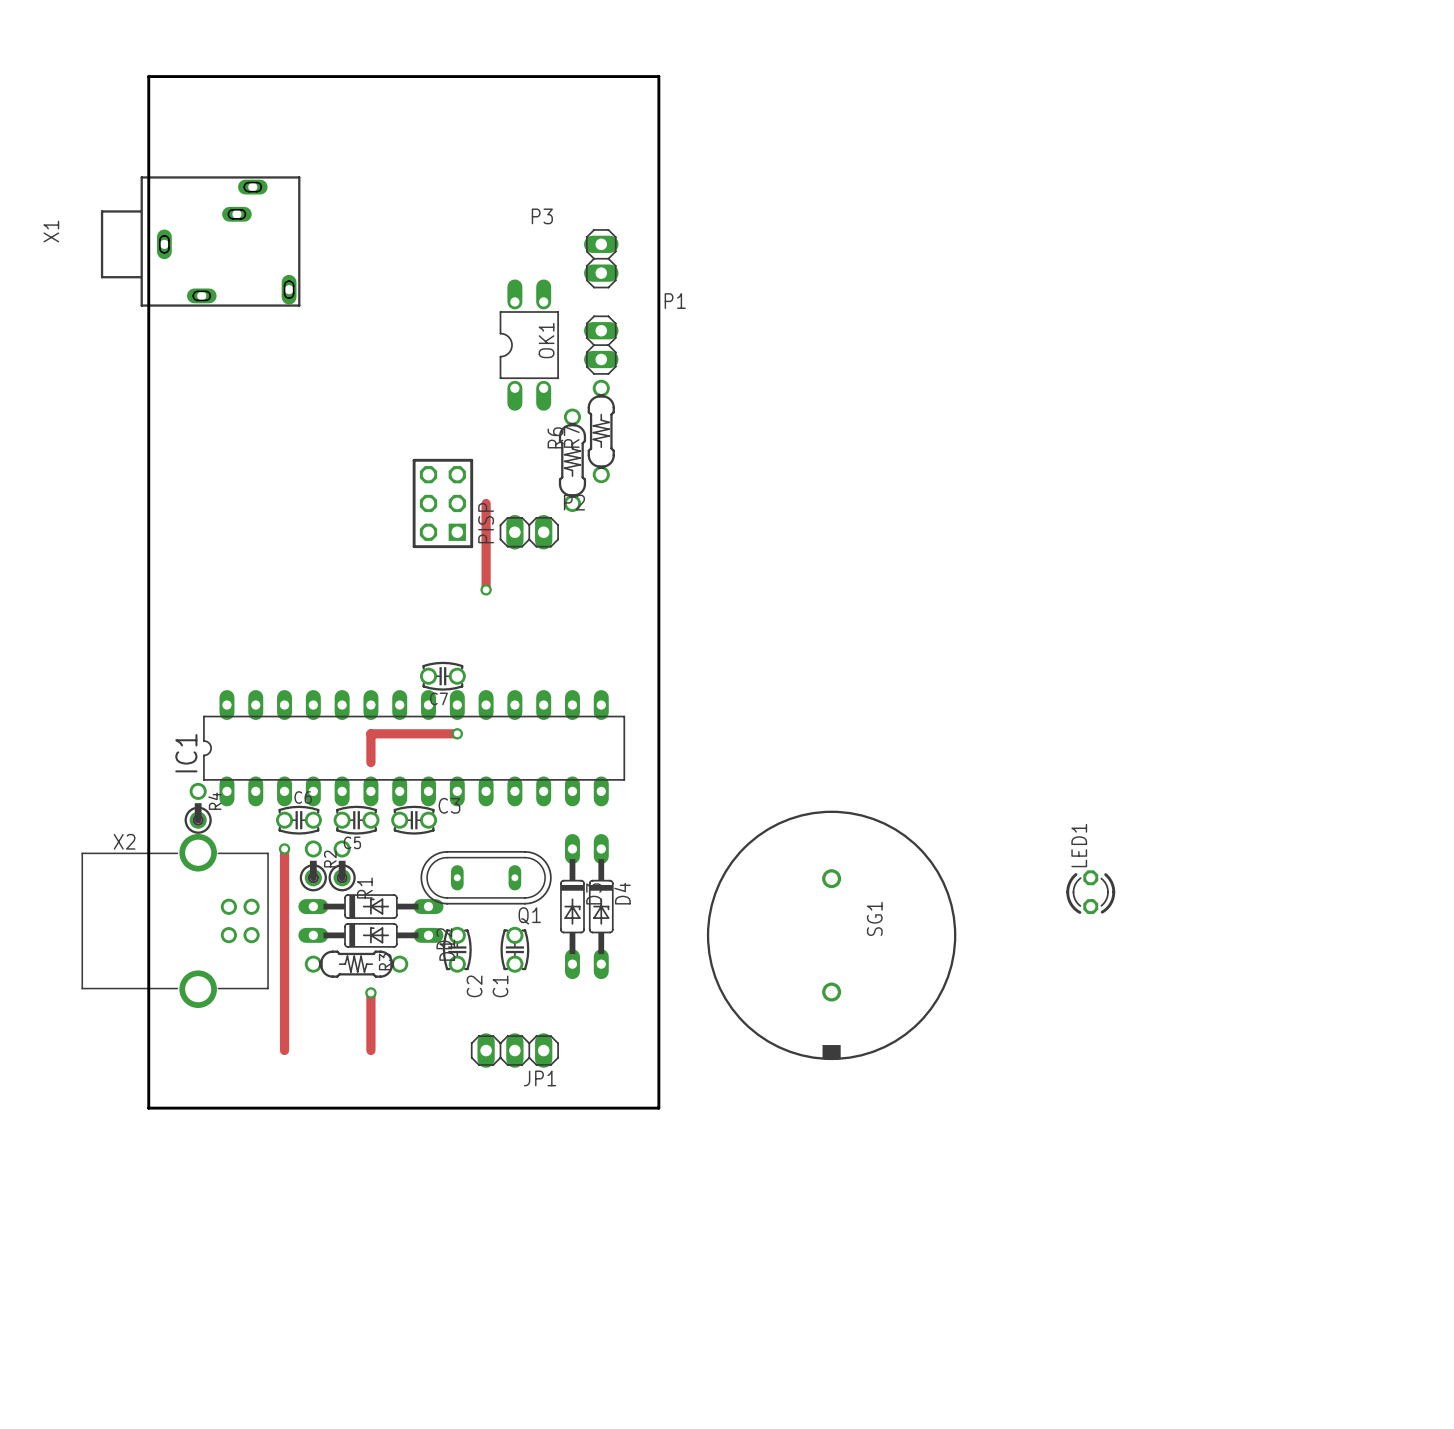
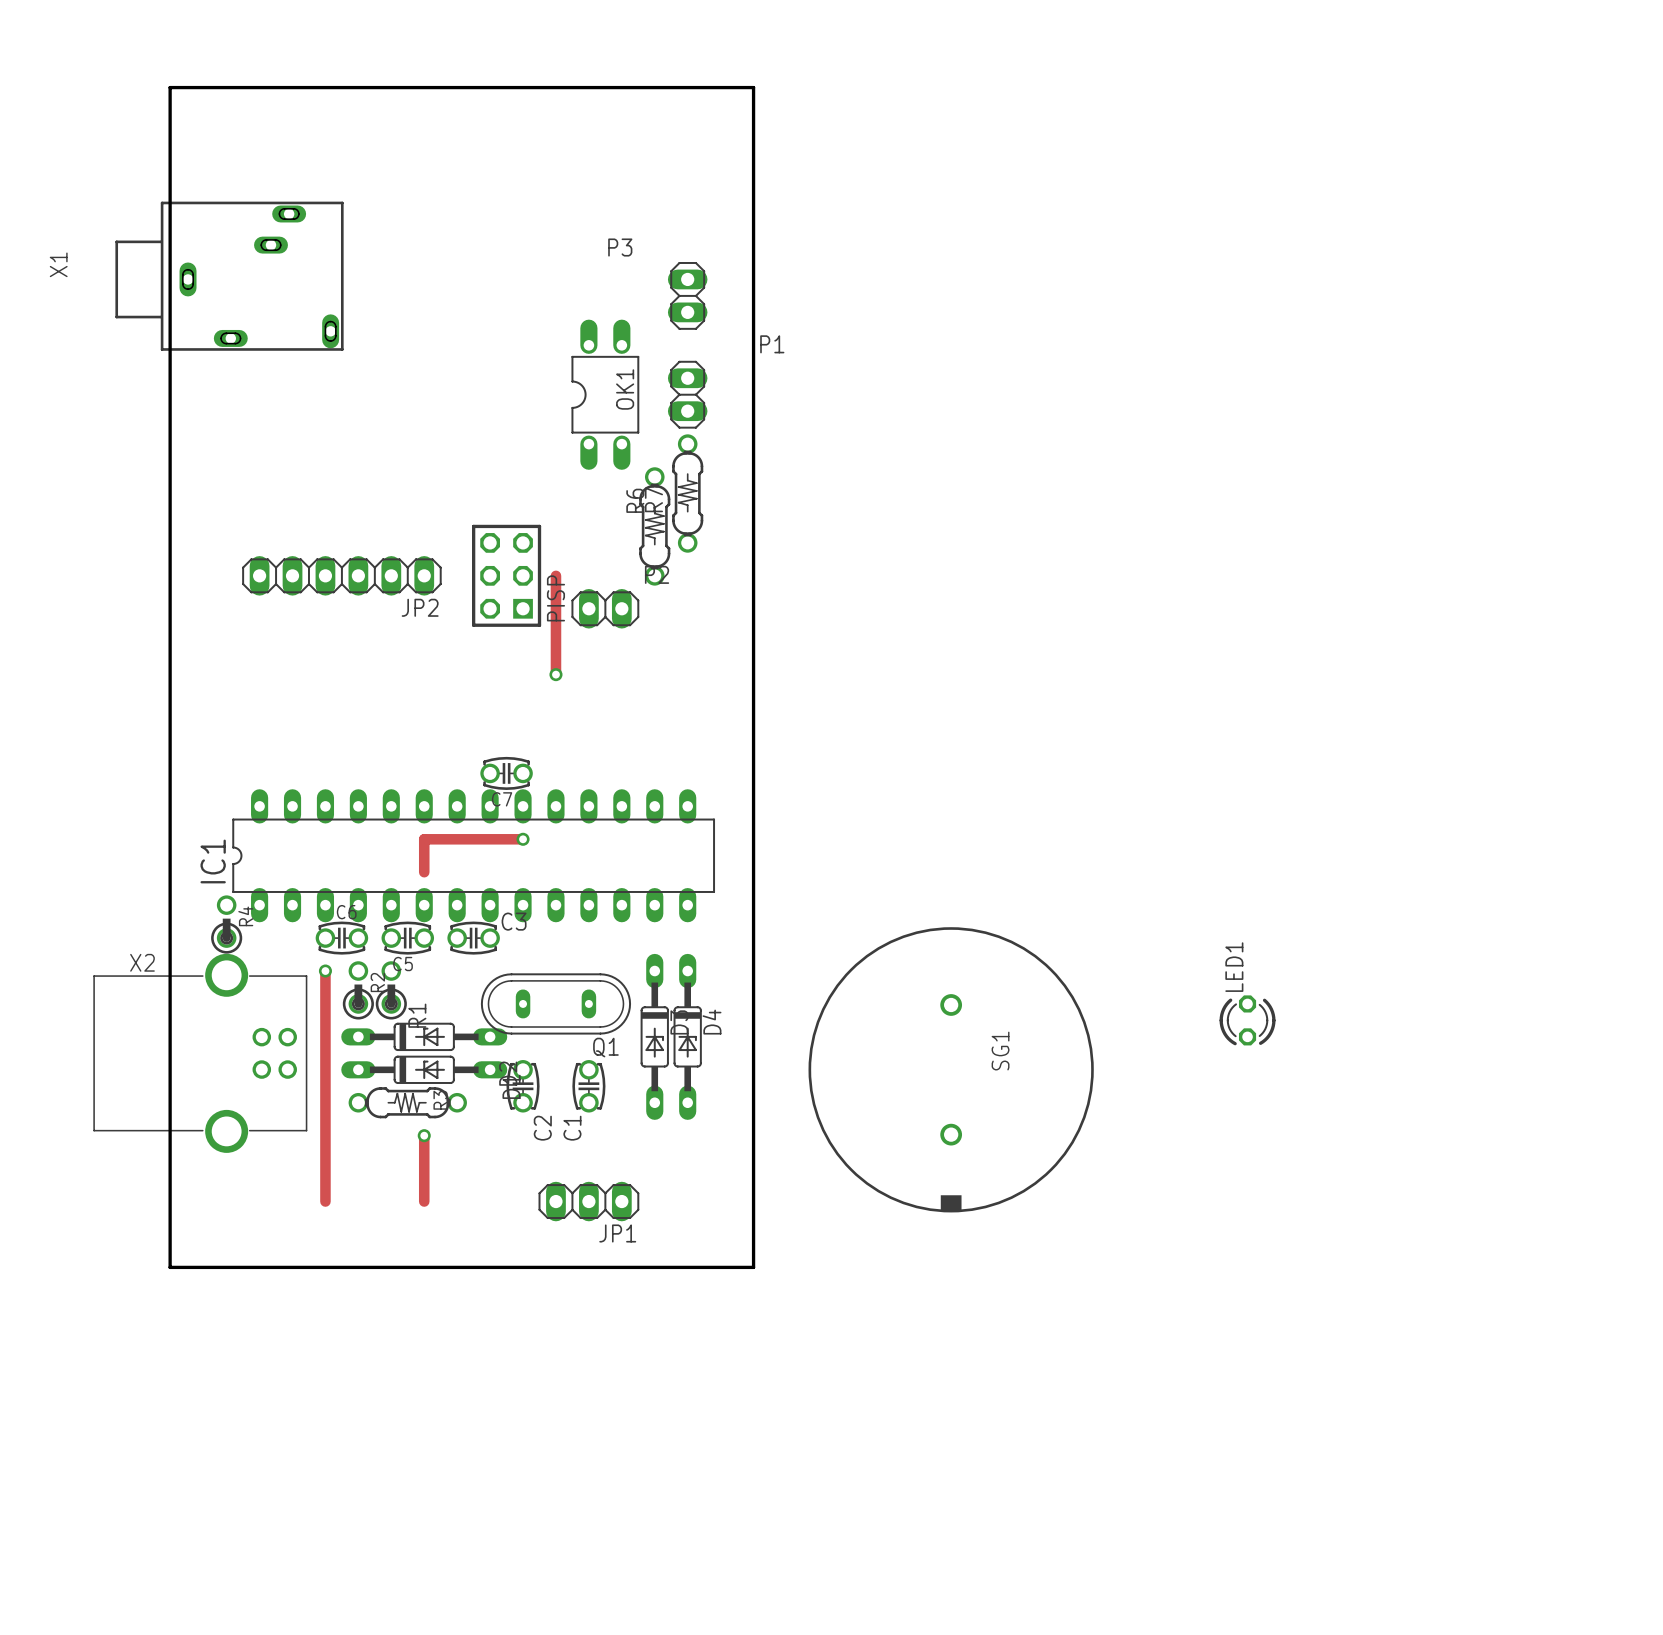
JP2: none -> (341, 575)

